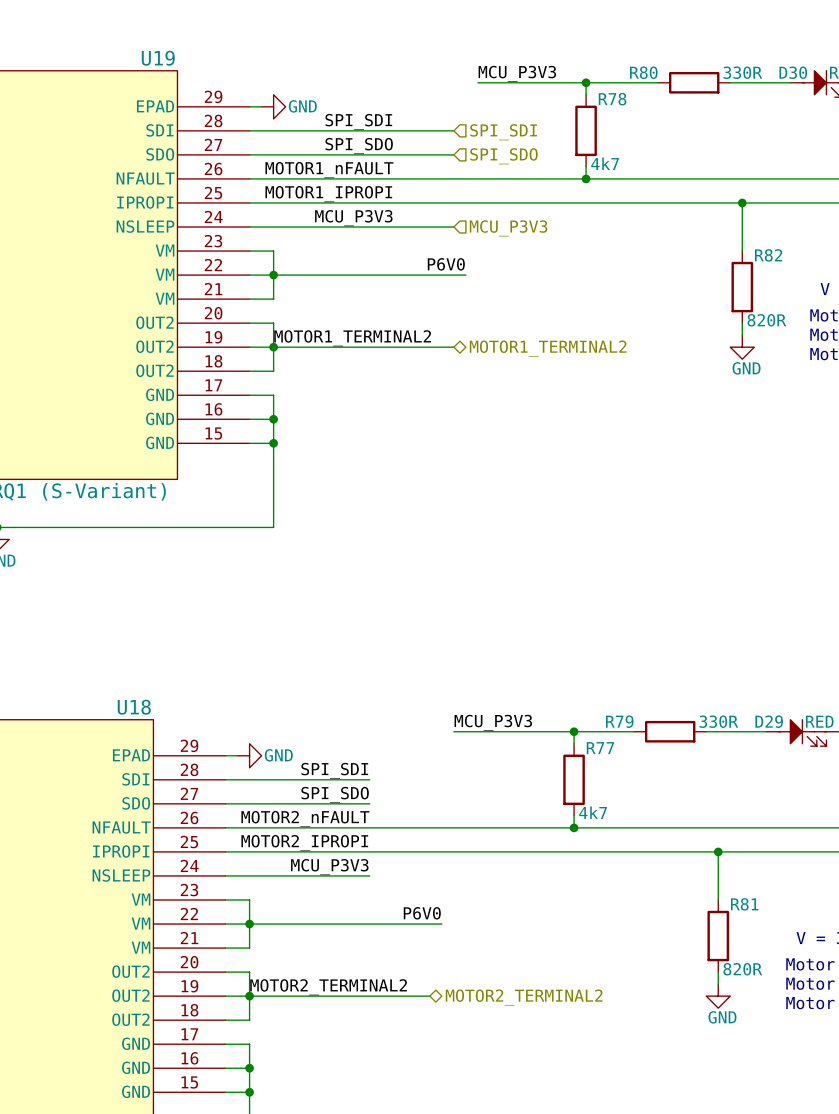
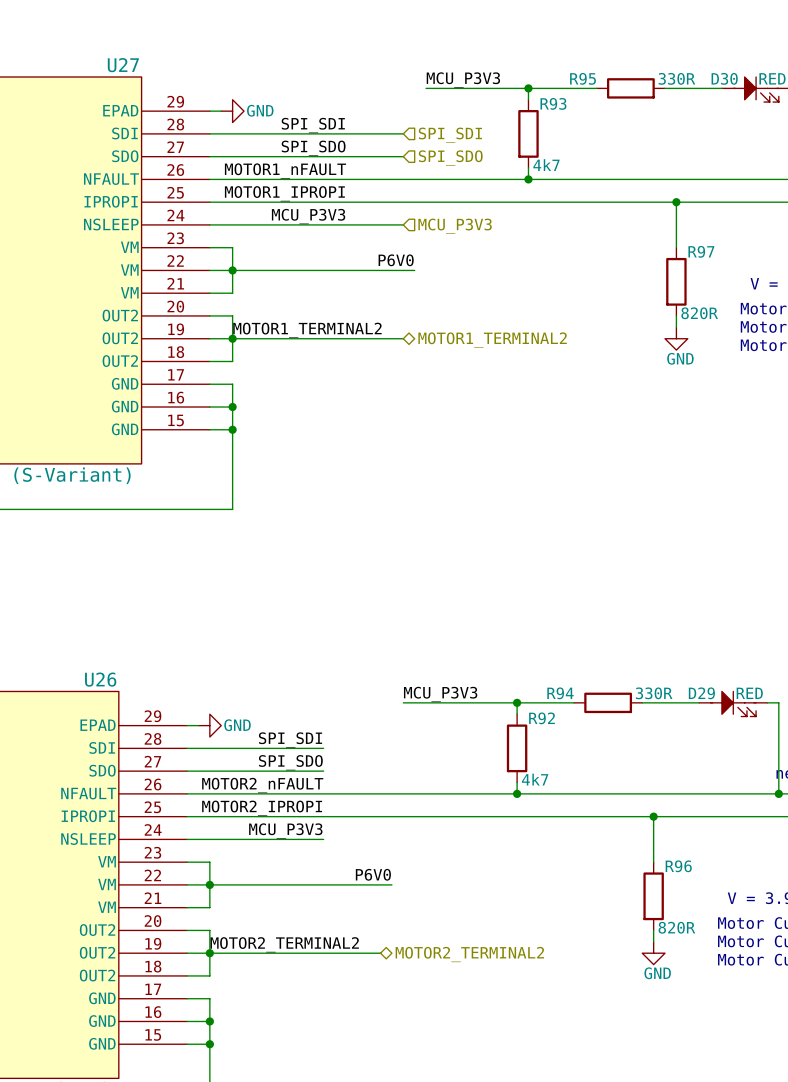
U19 name: U19 (158, 58) -> U27 (123, 65)
R80 name: R80 (643, 72) -> R95 (583, 78)
R78 name: R78 (612, 99) -> R93 (553, 103)
R82 name: R82 (768, 255) -> R97 (701, 251)
U18 name: U18 (134, 707) -> U26 (100, 679)
R79 name: R79 (619, 721) -> R94 (560, 693)
R77 name: R77 (600, 748) -> R92 (542, 718)
R81 name: R81 (744, 904) -> R96 (678, 866)

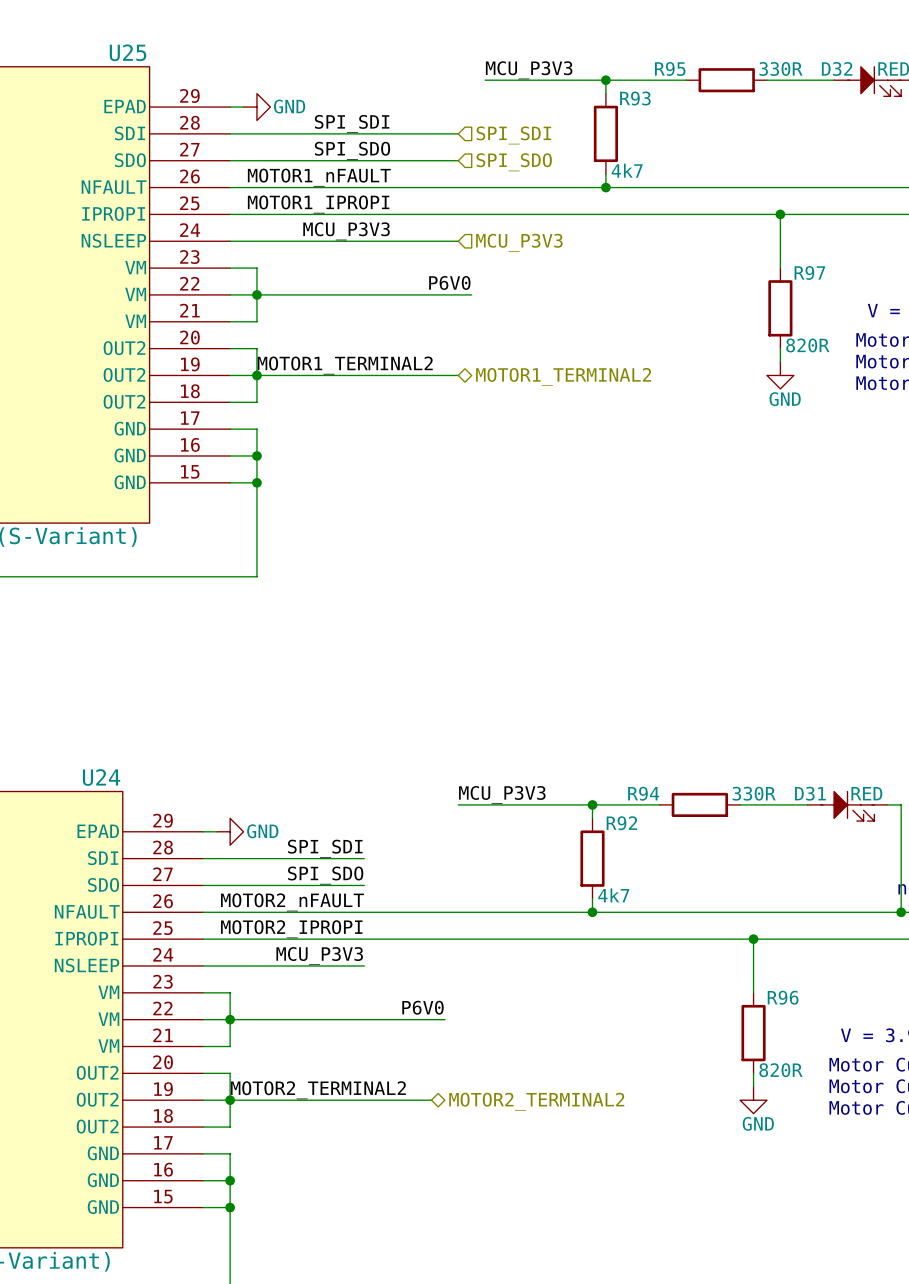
U27 name: U27 (123, 65) -> U25 (128, 52)
D30 name: D30 (724, 78) -> D32 (837, 68)
U26 name: U26 (100, 679) -> U24 (101, 777)
D29 name: D29 (701, 693) -> D31 (810, 793)

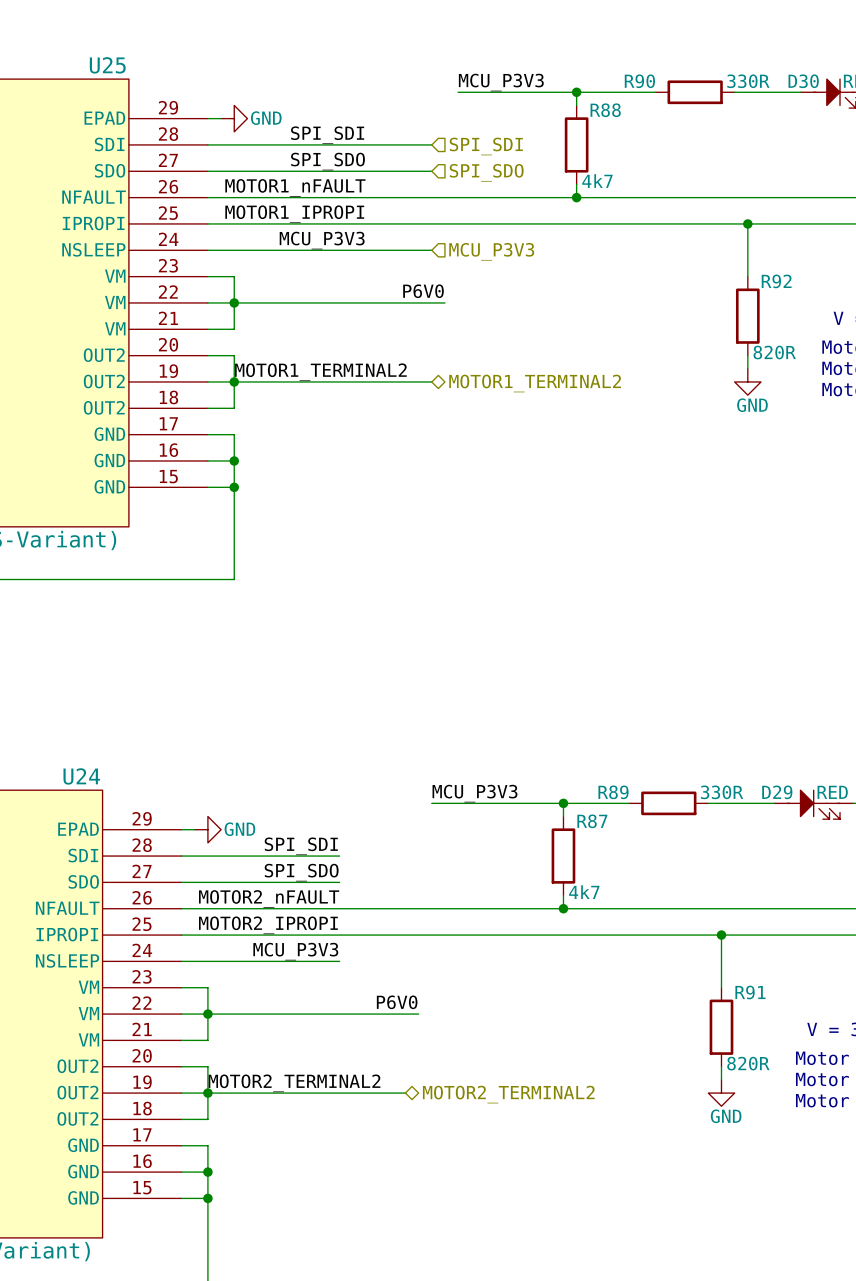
R95 name: R95 (670, 68) -> R90 (639, 81)
D32 name: D32 (837, 68) -> D30 (803, 81)
R93 name: R93 (635, 98) -> R88 (605, 110)
R97 name: R97 (809, 272) -> R92 (776, 281)
R94 name: R94 (643, 793) -> R89 (613, 792)
D31 name: D31 (810, 793) -> D29 (777, 792)
R92 name: R92 (621, 823) -> R87 (592, 821)
R96 name: R96 (783, 997) -> R91 (750, 992)

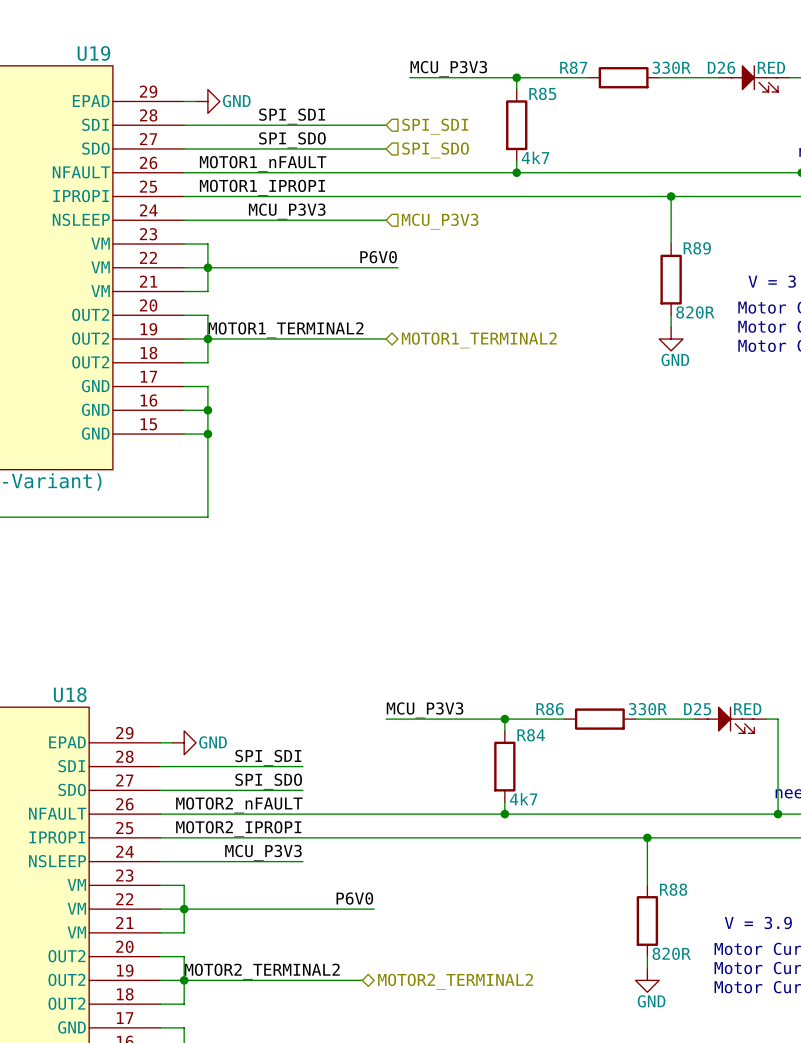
U25 name: U25 (107, 65) -> U19 (93, 53)
R90 name: R90 (639, 81) -> R87 (573, 67)
D30 name: D30 (803, 81) -> D26 (721, 67)
R88 name: R88 (605, 110) -> R85 (542, 93)
R92 name: R92 (776, 281) -> R89 (697, 248)
U24 name: U24 (81, 776) -> U18 (70, 694)
R89 name: R89 (613, 792) -> R86 (550, 709)
D29 name: D29 (777, 792) -> D25 (697, 709)
R87 name: R87 (592, 821) -> R84 (531, 735)
R91 name: R91 (750, 992) -> R88 (673, 889)

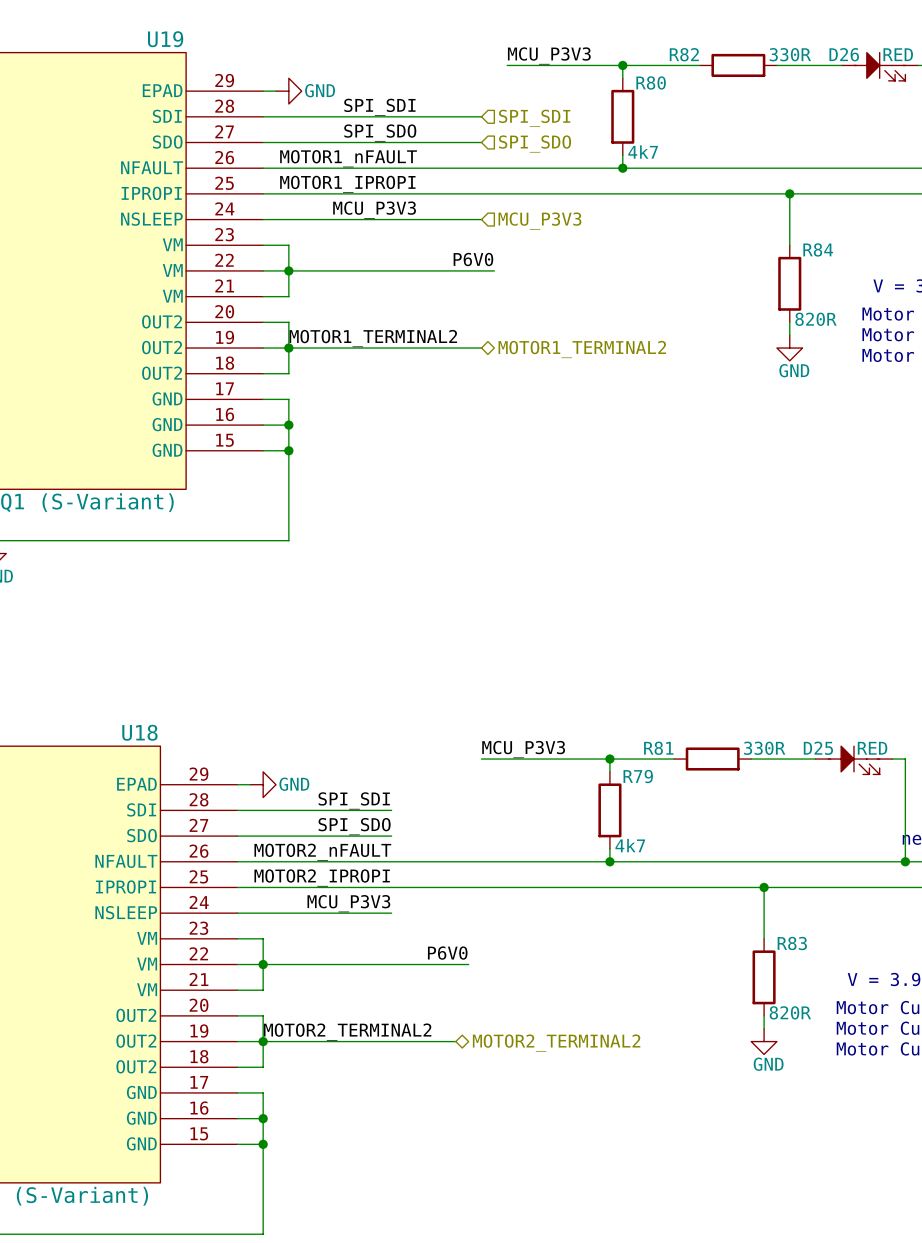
R87 name: R87 (573, 67) -> R82 (684, 54)
R85 name: R85 (542, 93) -> R80 (651, 82)
R89 name: R89 (697, 248) -> R84 (818, 249)
R86 name: R86 (550, 709) -> R81 (658, 748)
R84 name: R84 (531, 735) -> R79 (638, 776)
R88 name: R88 (673, 889) -> R83 (792, 943)

